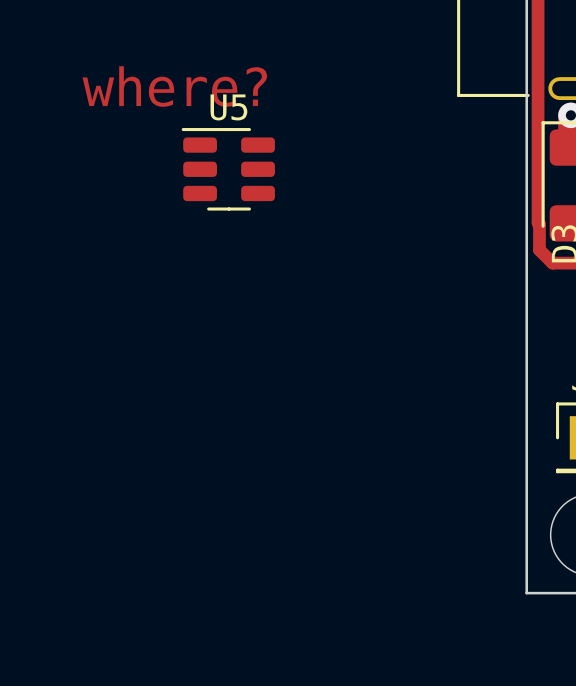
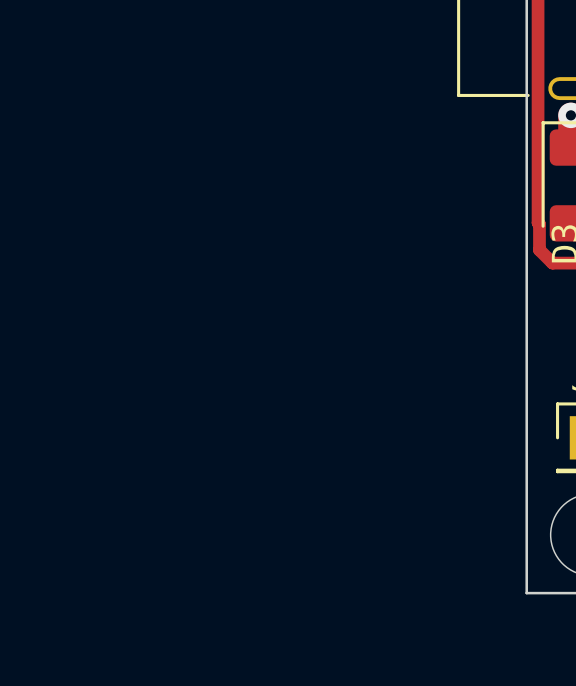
text: where? (174, 86) -> none
U5: (228, 169) -> none

